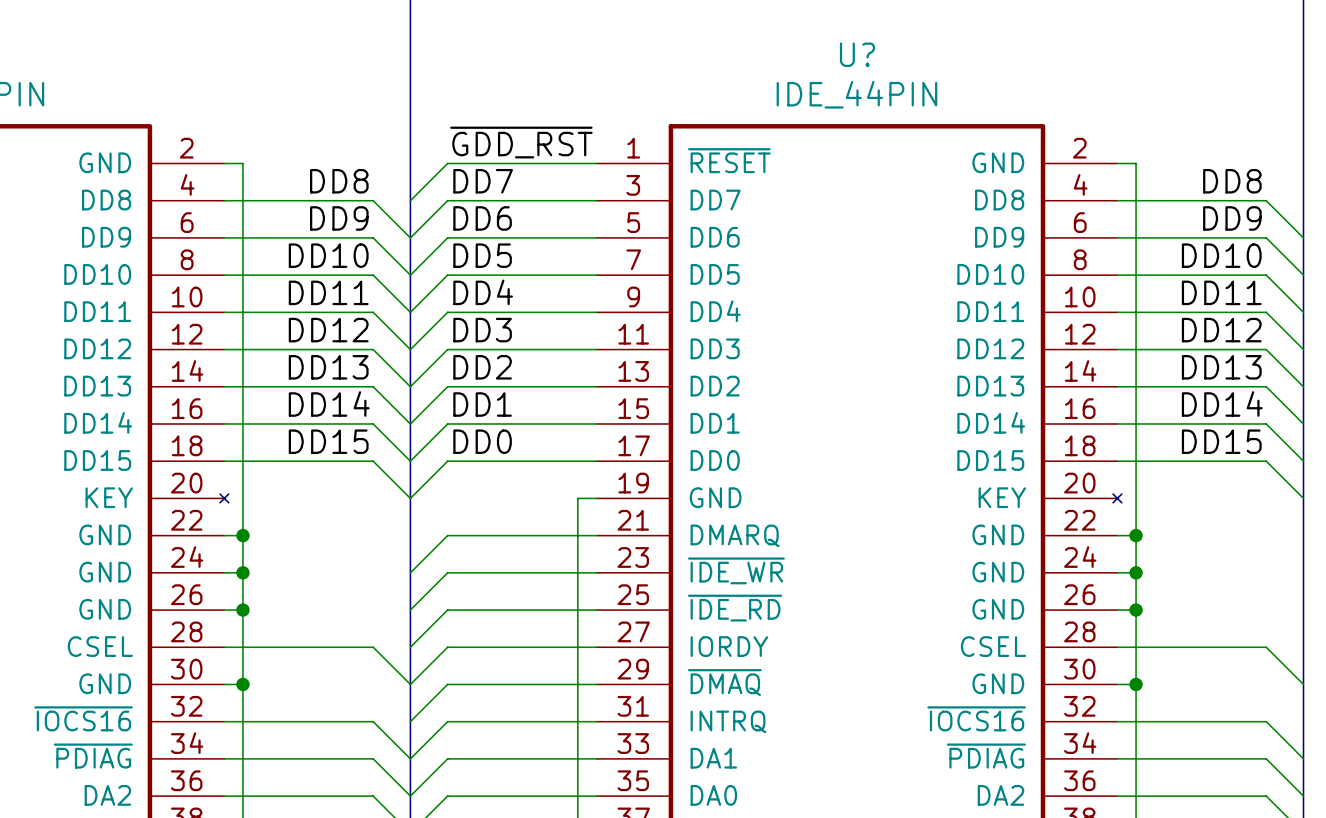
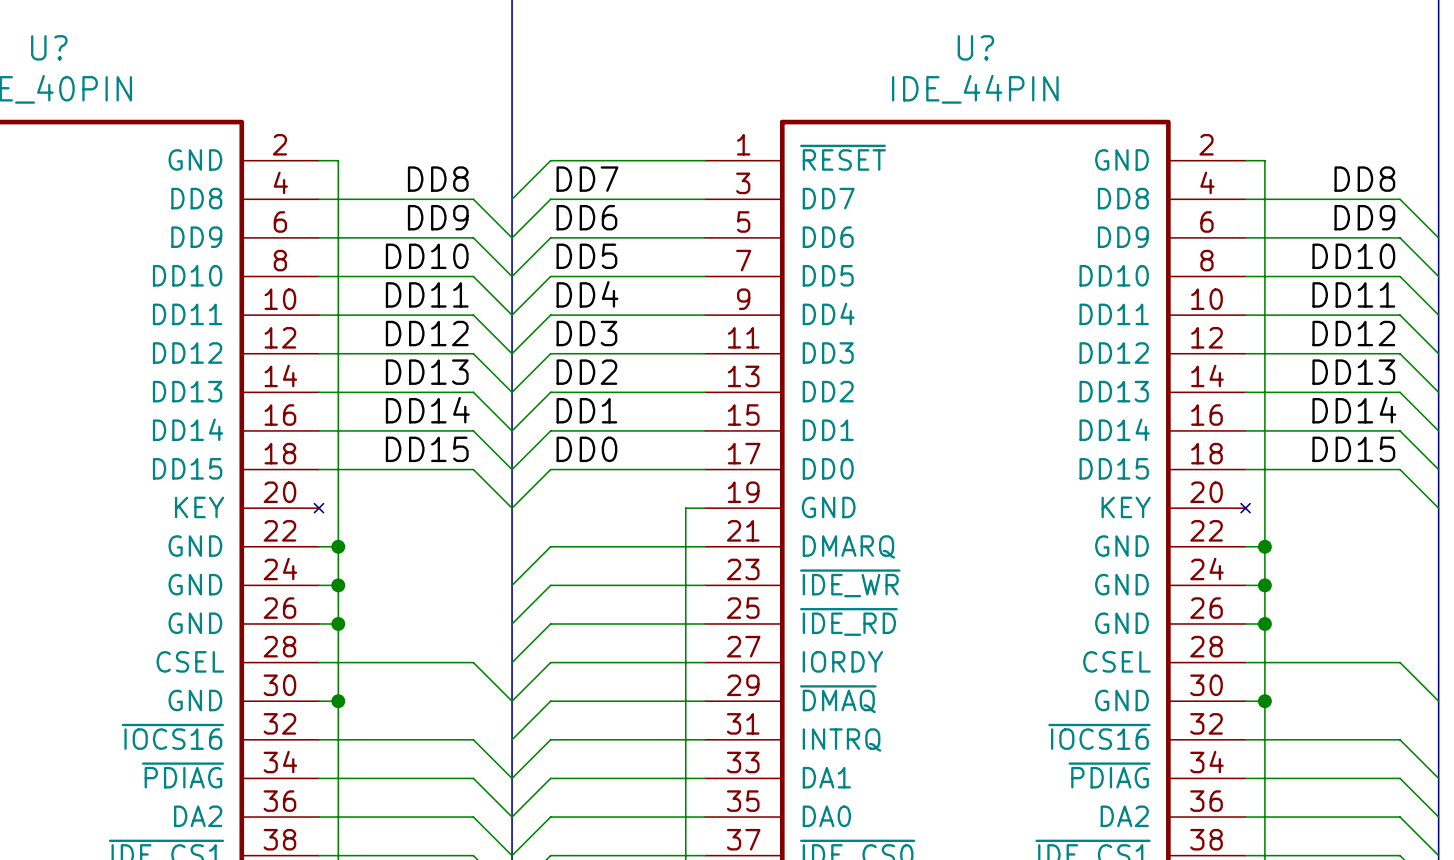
label: ~{GDD_RST} (521, 142) -> none

